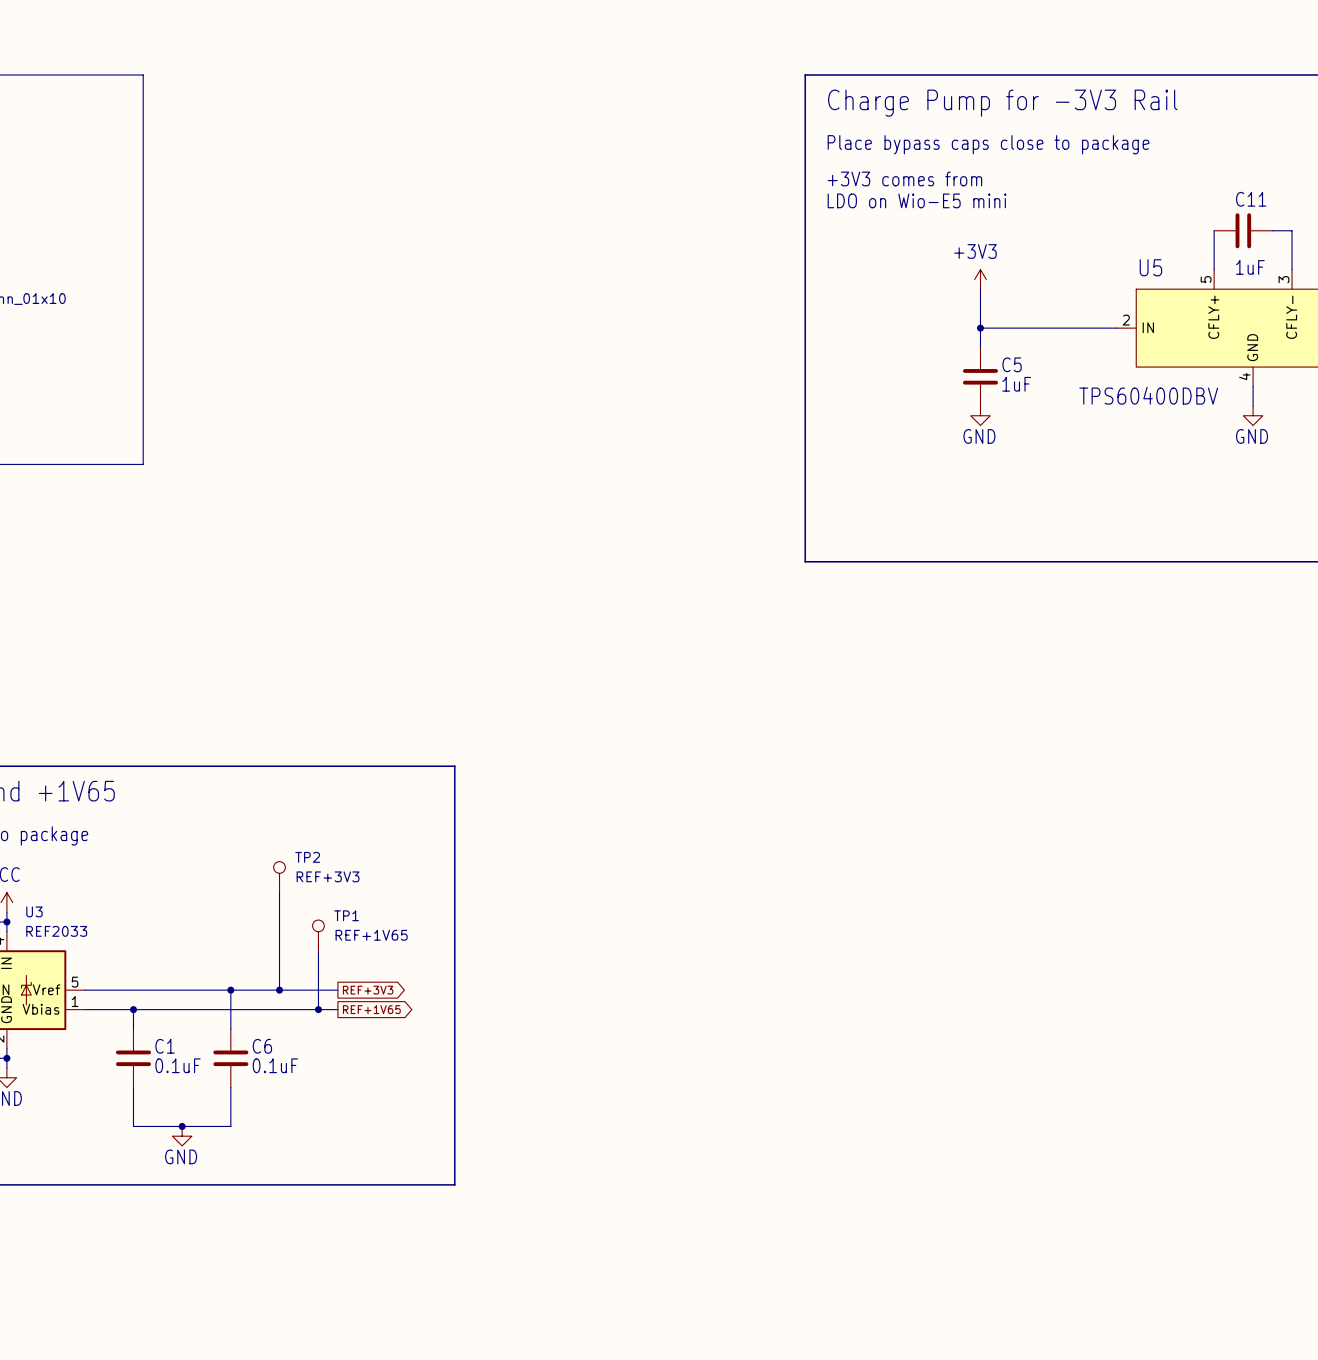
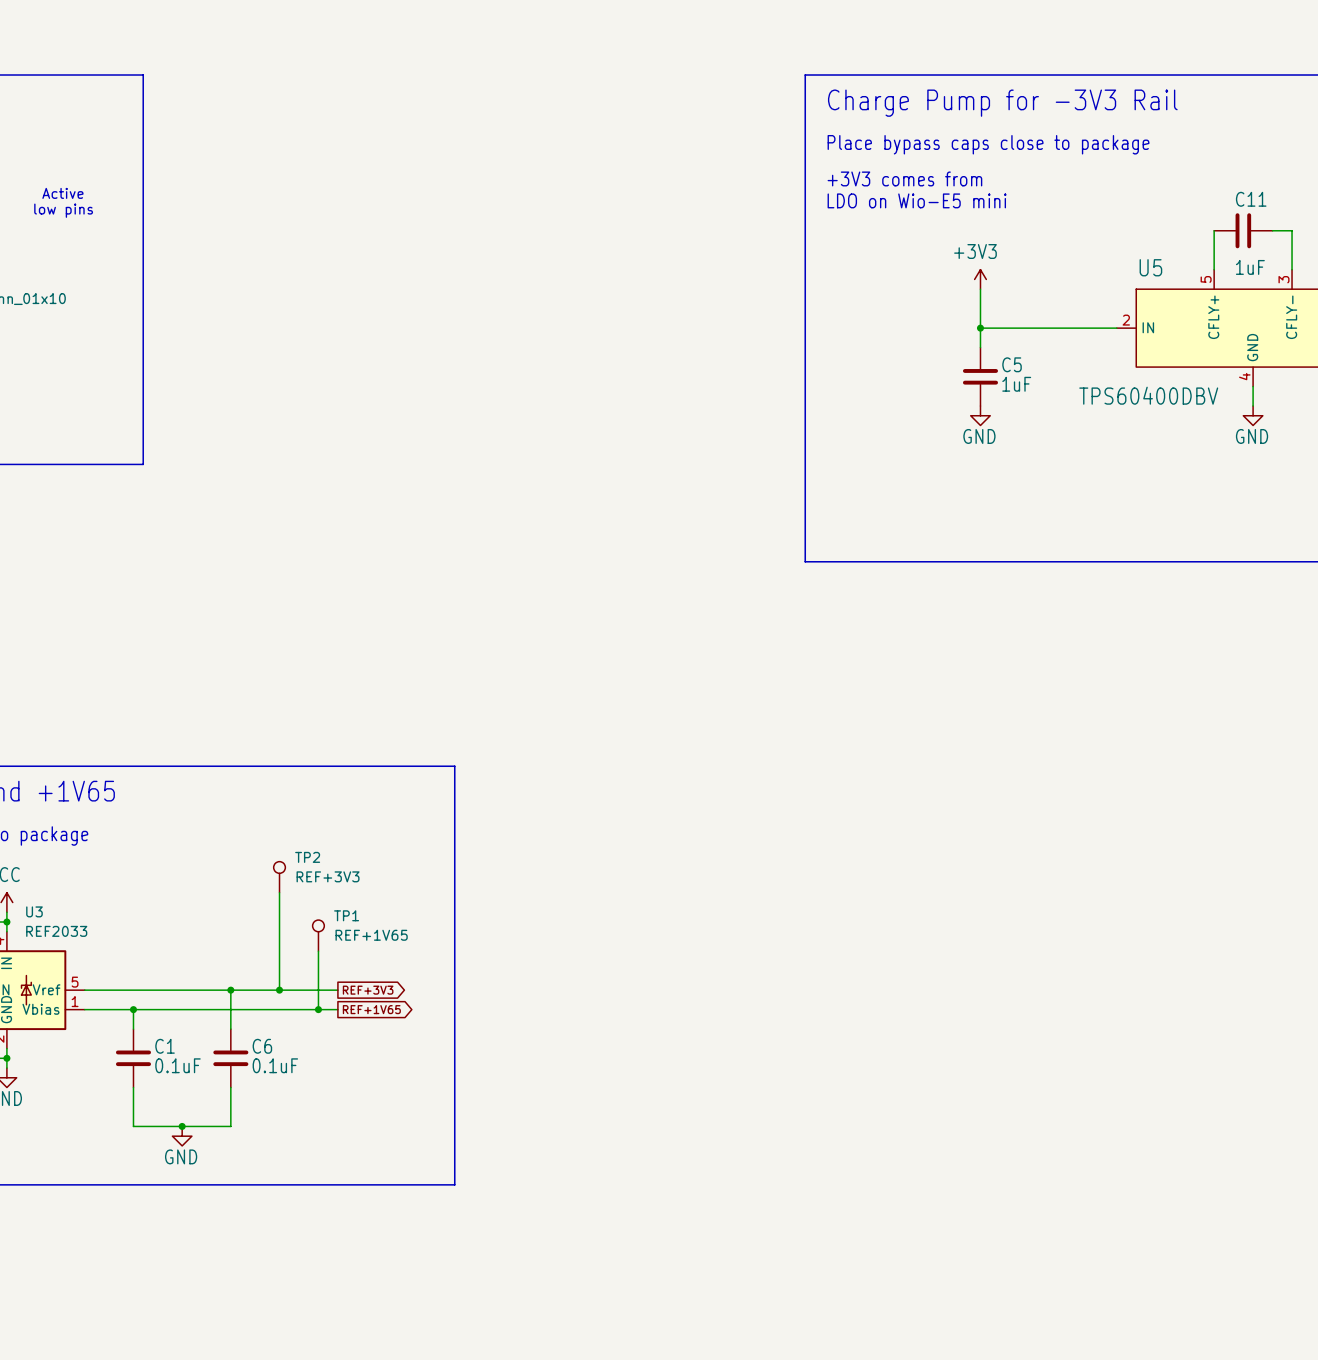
text: none -> Active (62, 193)
text: none -> low pins (63, 210)

